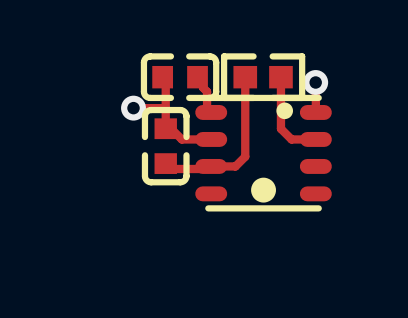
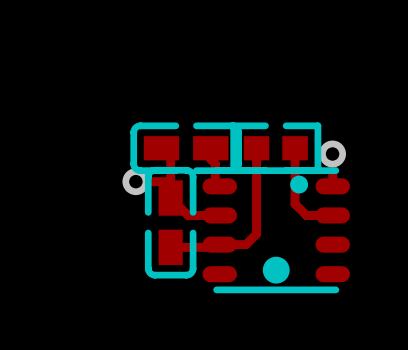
part footprint: [140, 53, 220, 102] -> [130, 122, 242, 175]
part footprint: [141, 106, 190, 186] -> [144, 166, 197, 279]

